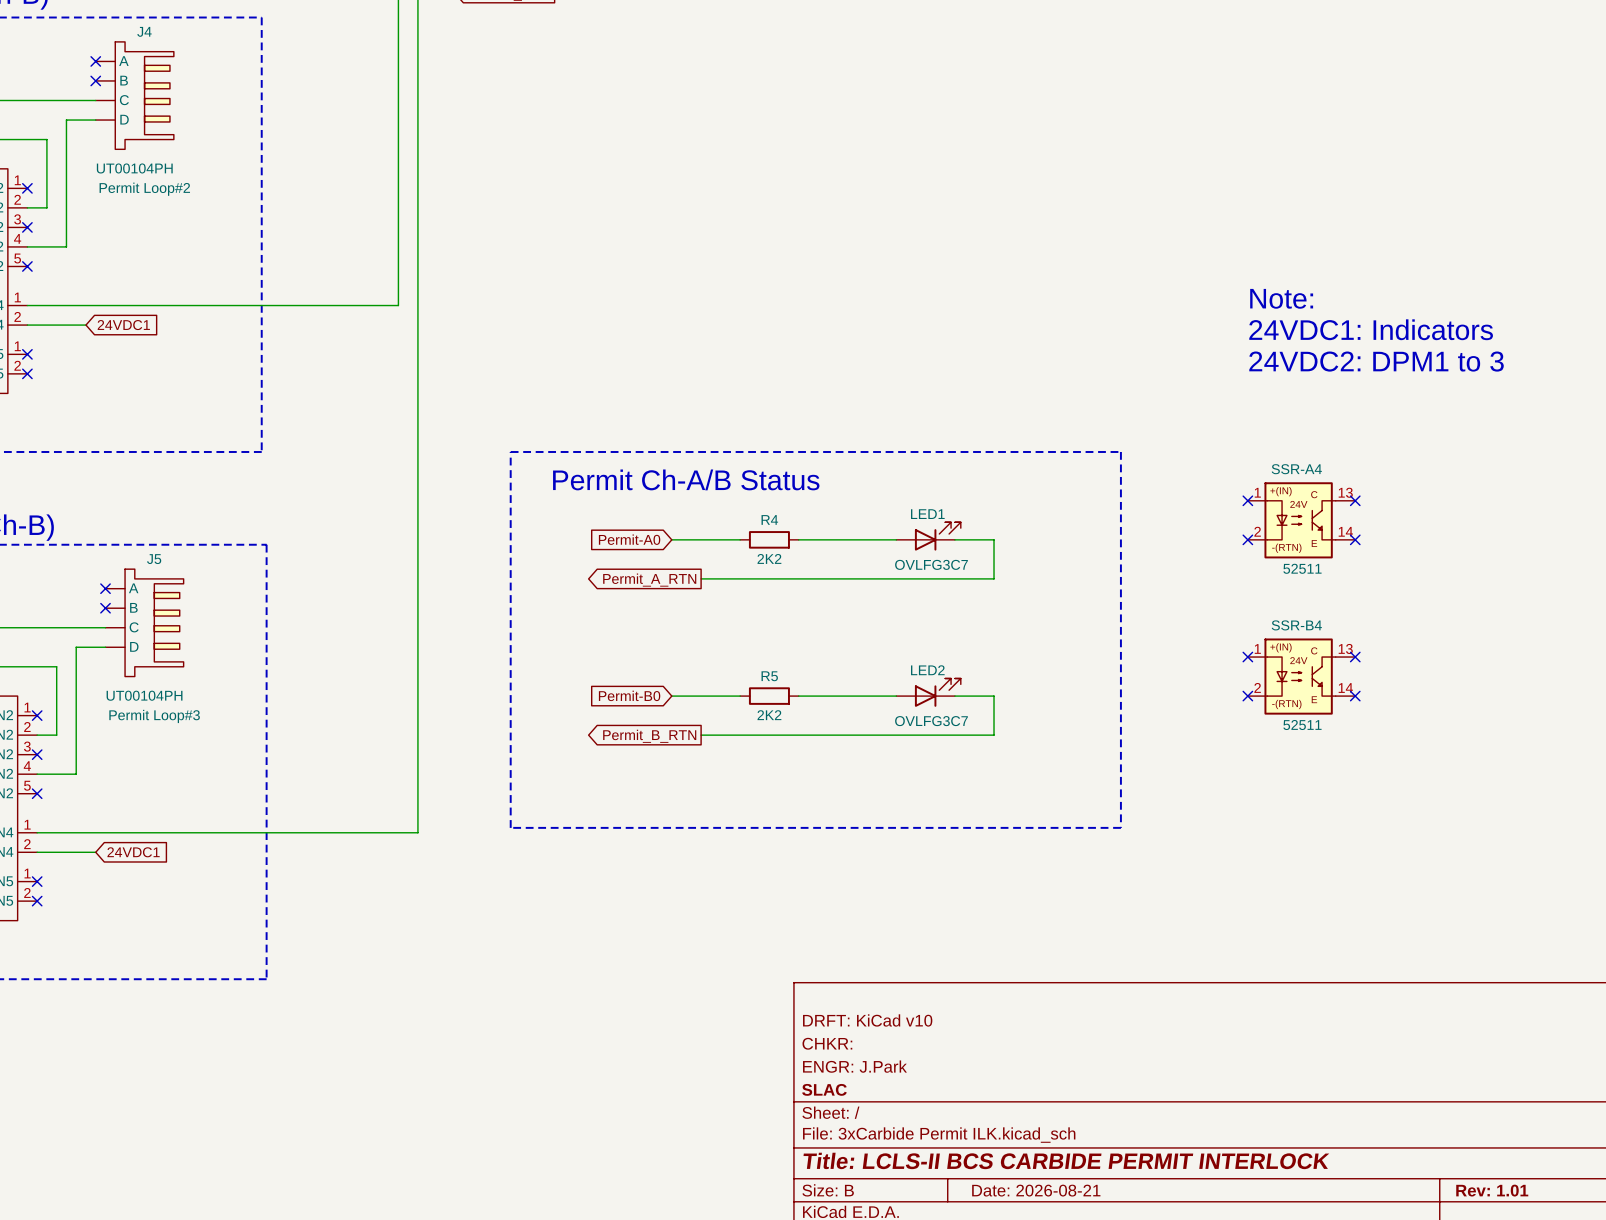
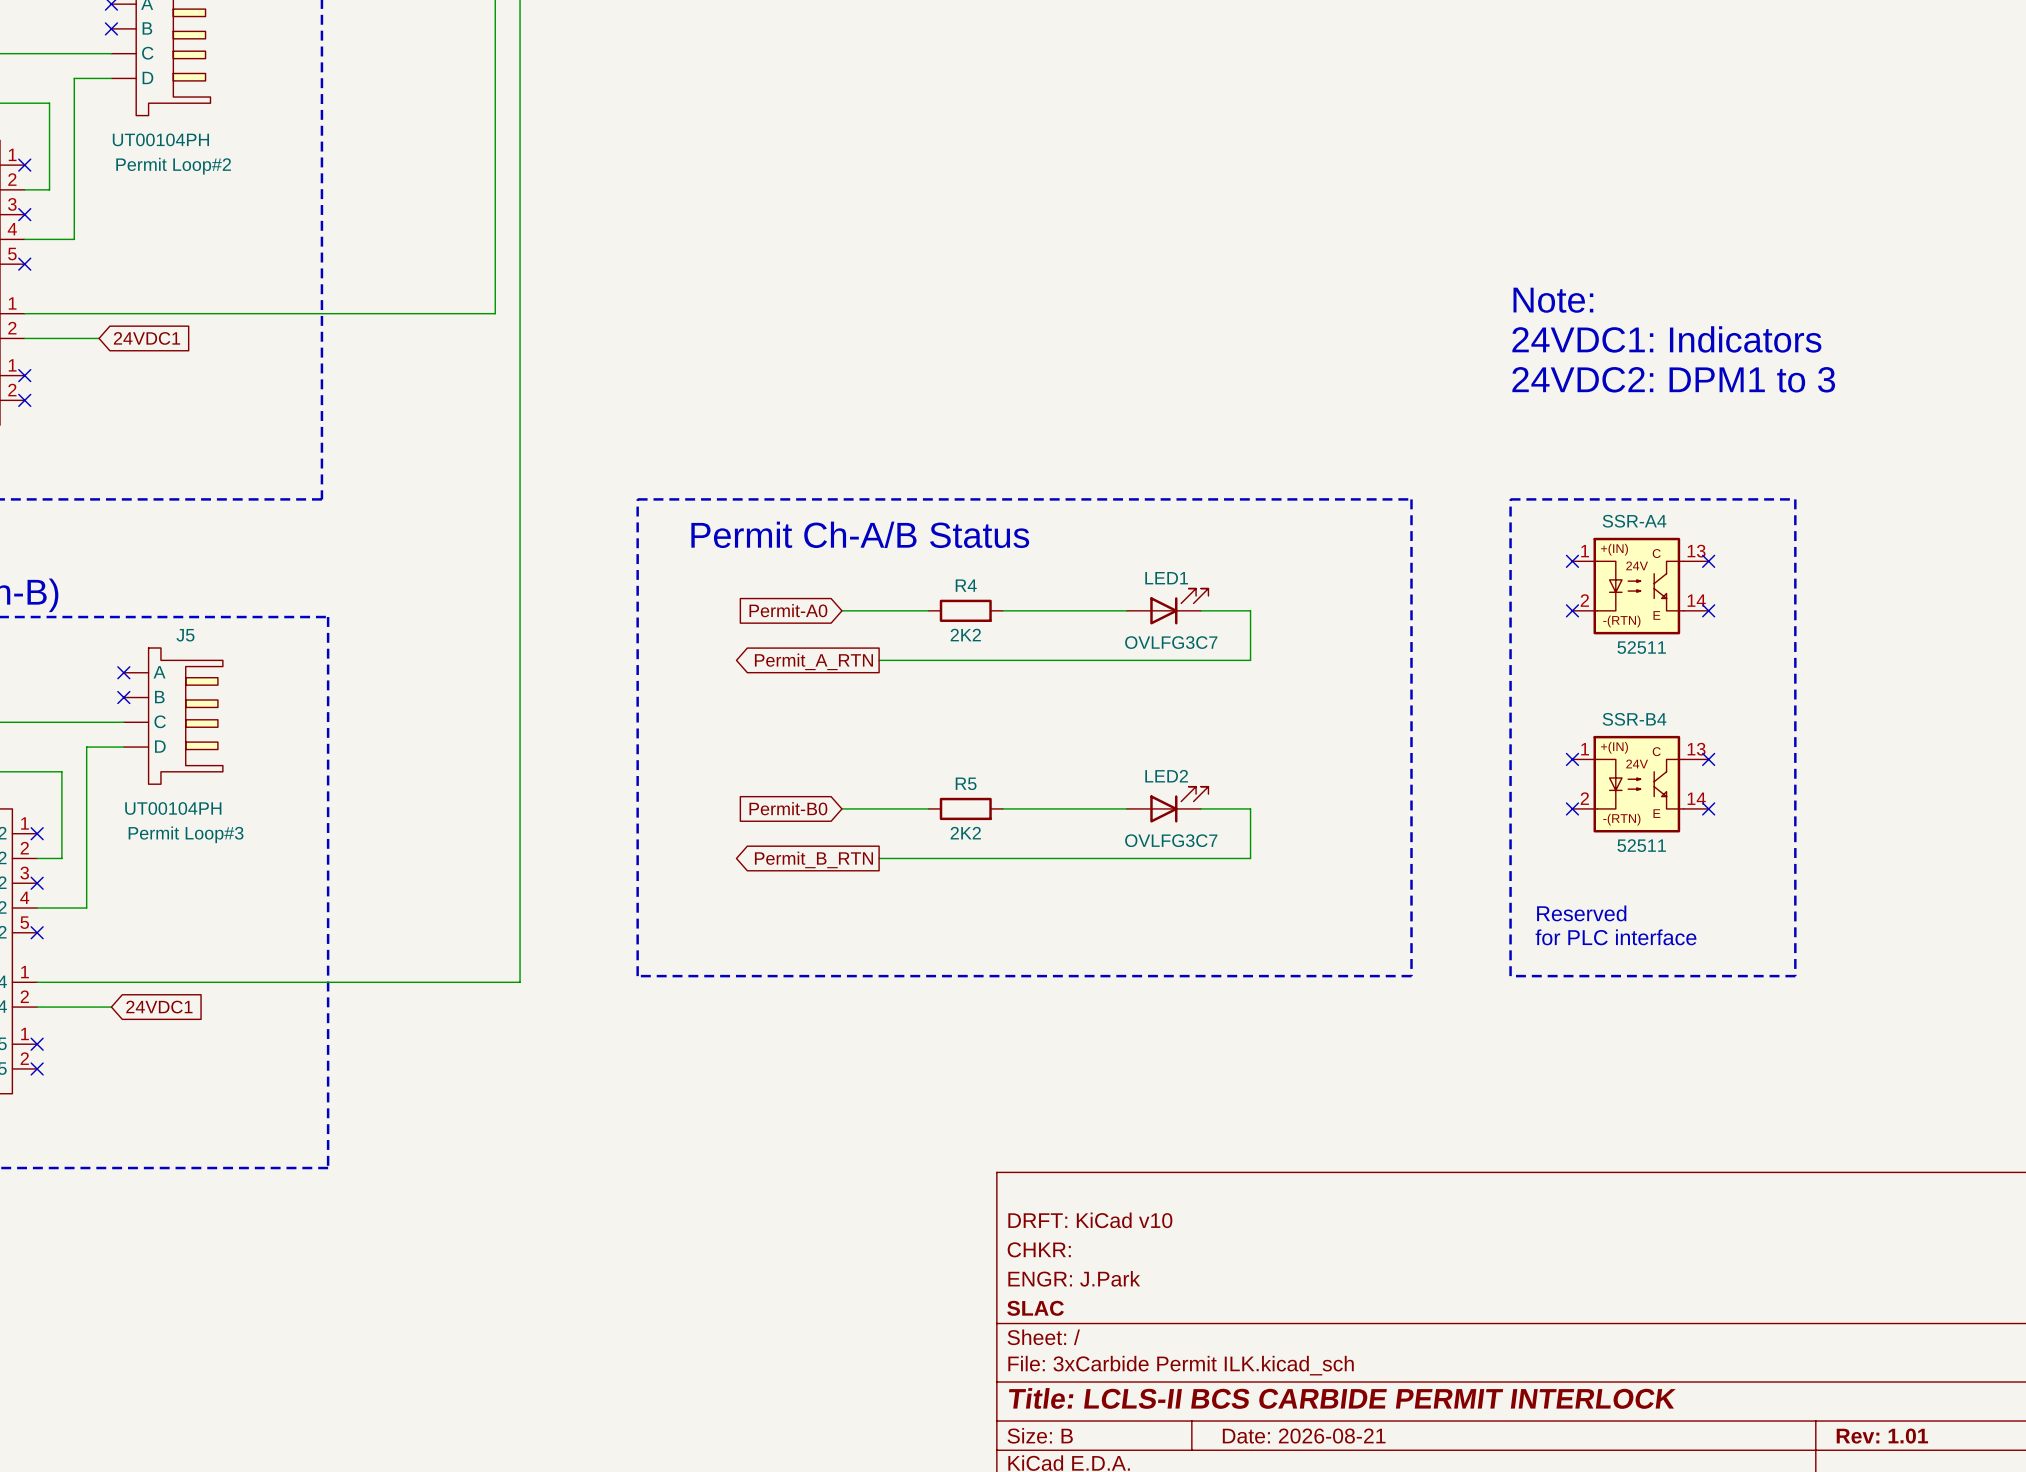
text position: Note: (1281, 298) -> Note: (1553, 300)
text position: 24VDC1: Indicators (1371, 329) -> 24VDC1: Indicators (1666, 339)
text position: 24VDC2: DPM1 to 3 (1376, 361) -> 24VDC2: DPM1 to 3 (1673, 379)
line: none -> (1510, 499) (1795, 499) (1795, 976) (1510, 976) (1510, 499)
text: none -> Reserved (1581, 913)
text: none -> for PLC interface (1616, 937)

